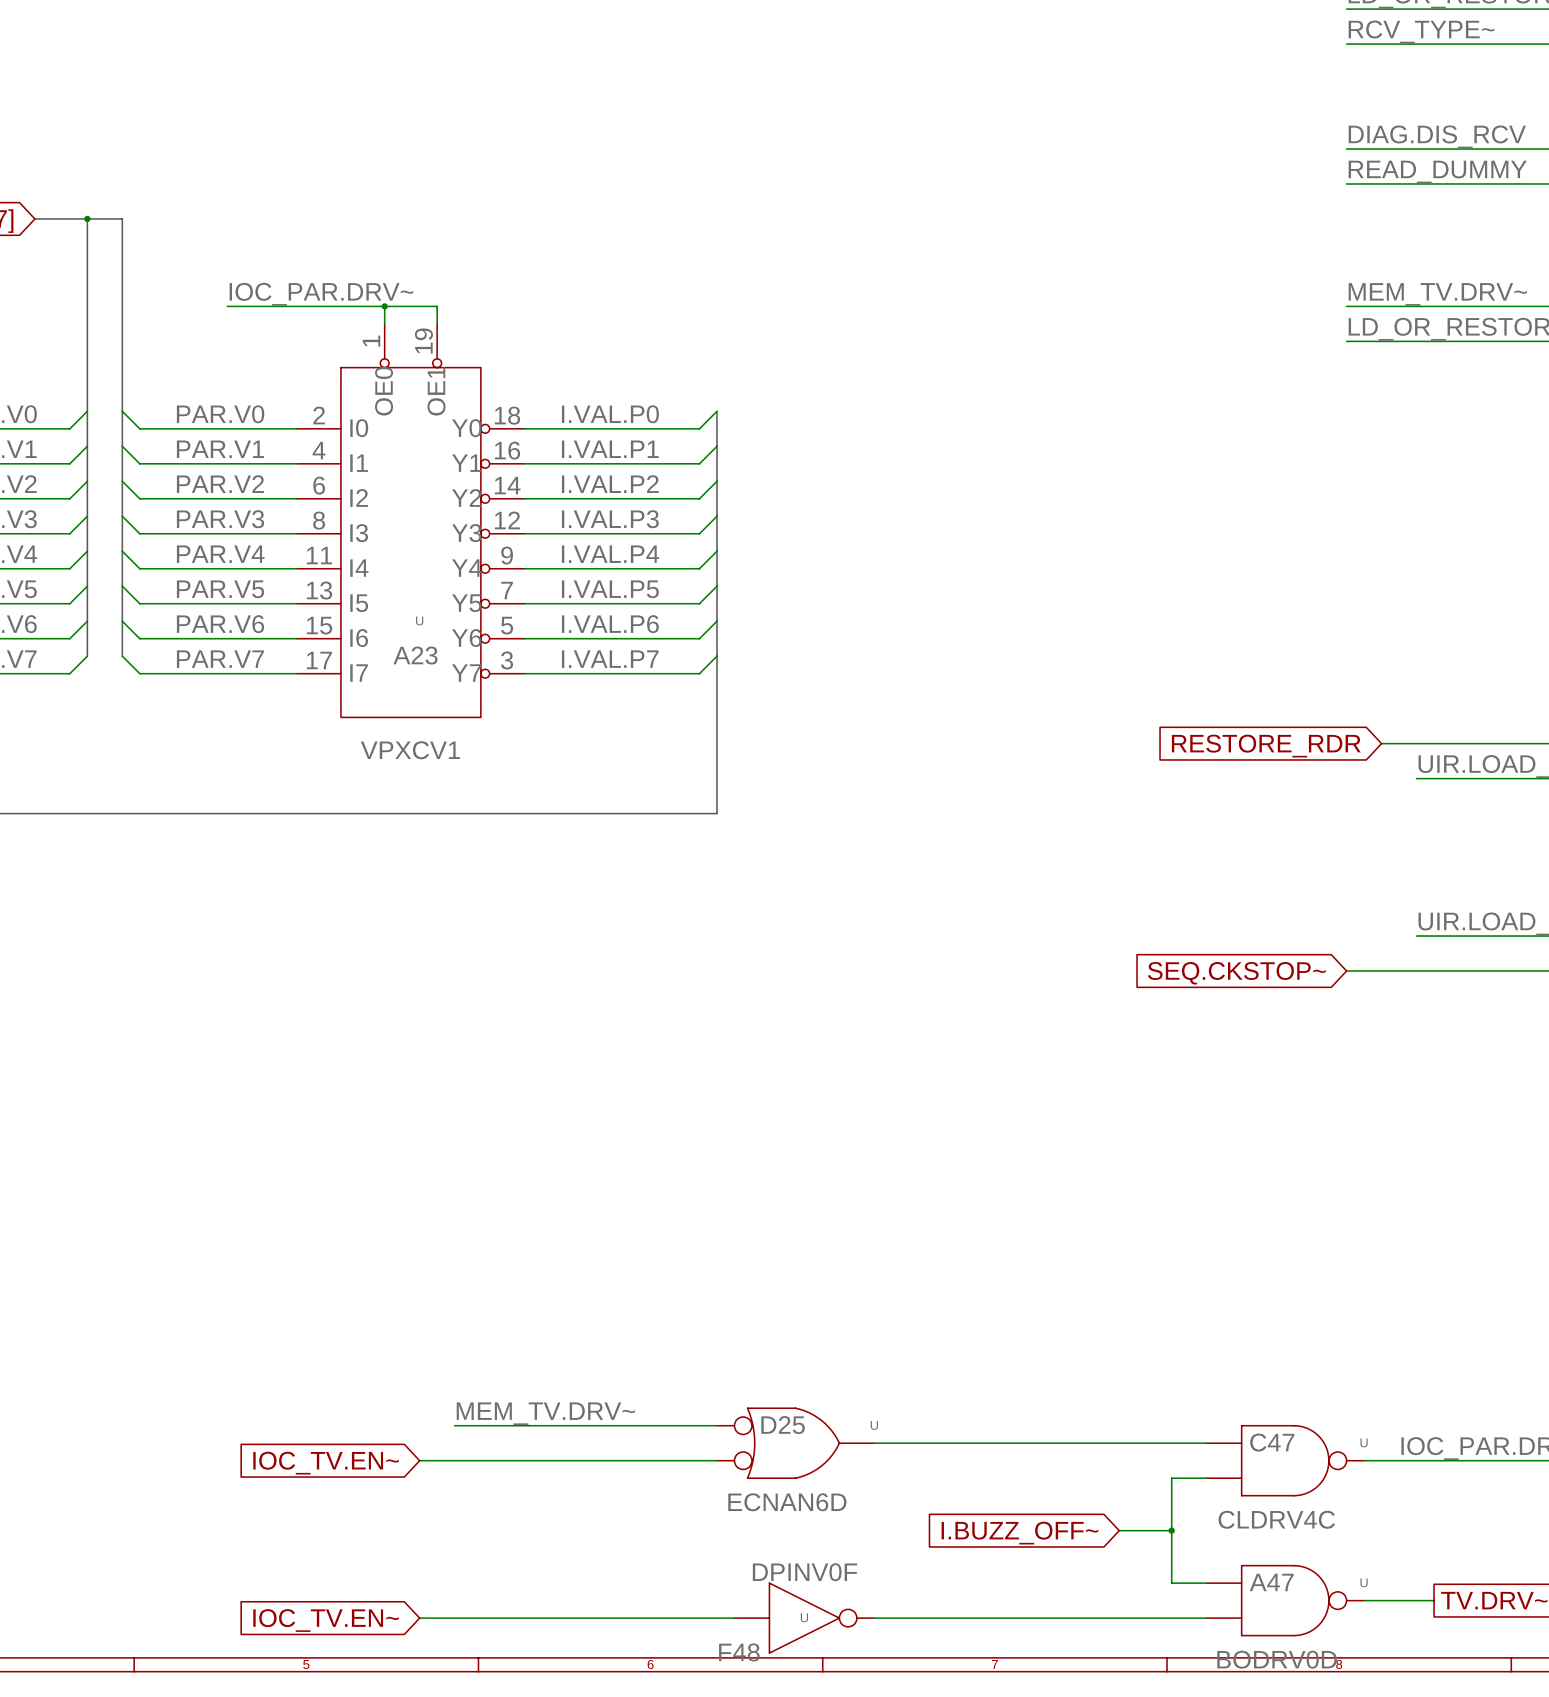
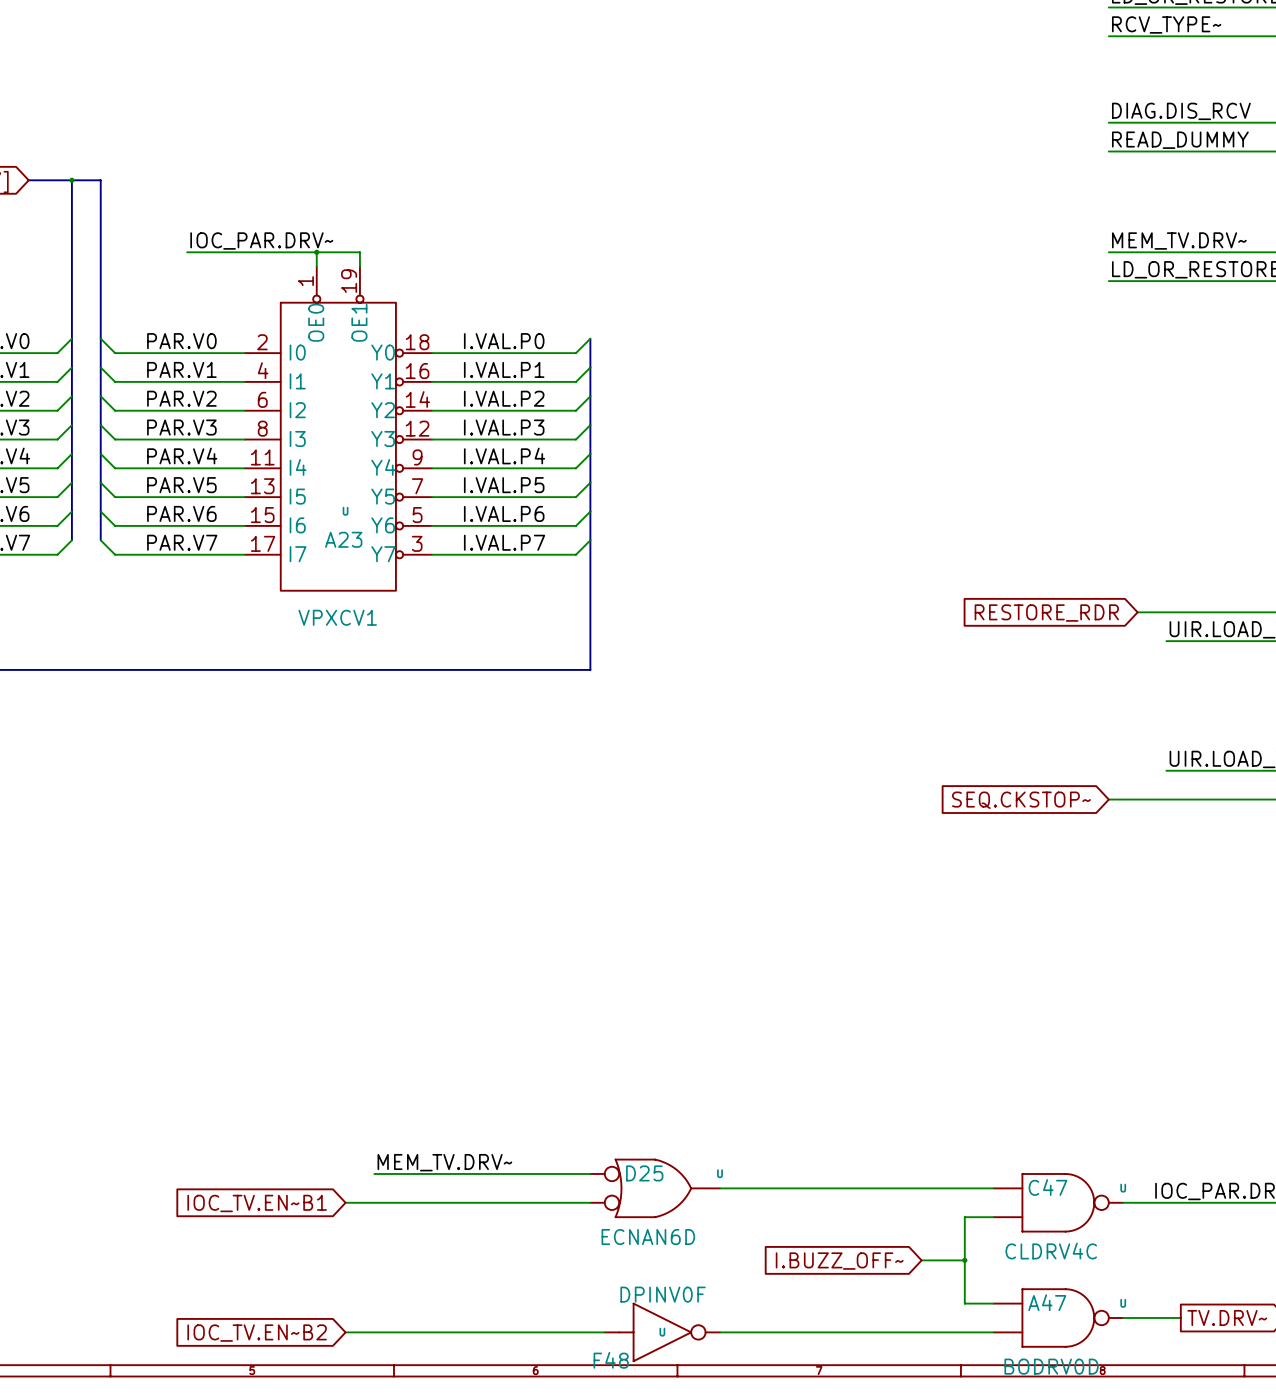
global label: IOC_TV.EN~ (326, 1463) -> IOC_TV.EN~B1 (257, 1203)
global label: IOC_TV.EN~ (326, 1620) -> IOC_TV.EN~B2 (257, 1333)

